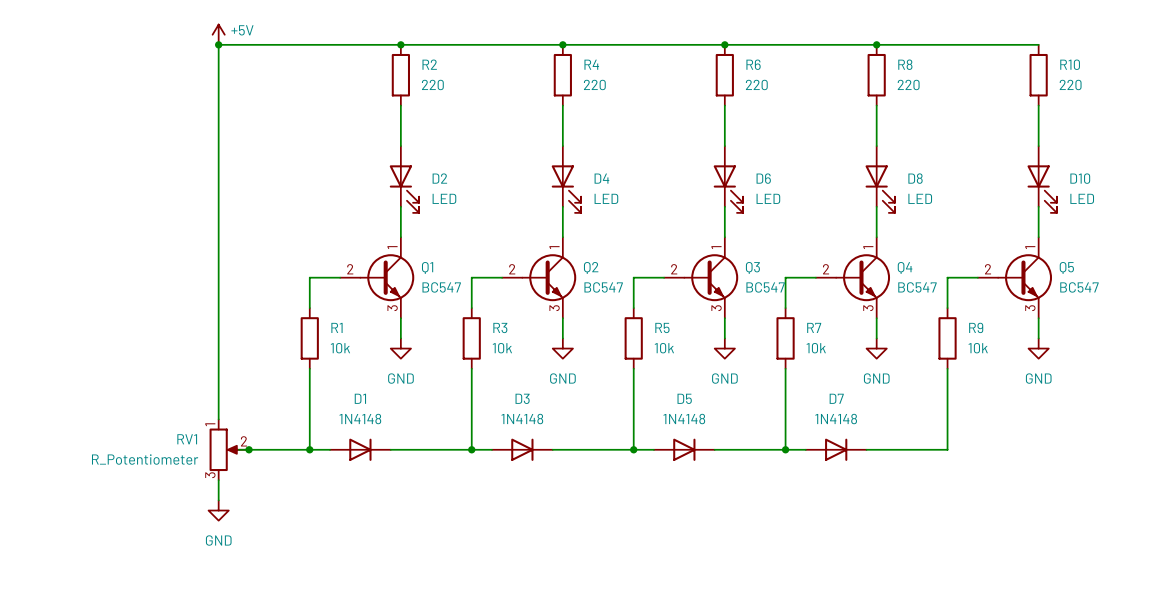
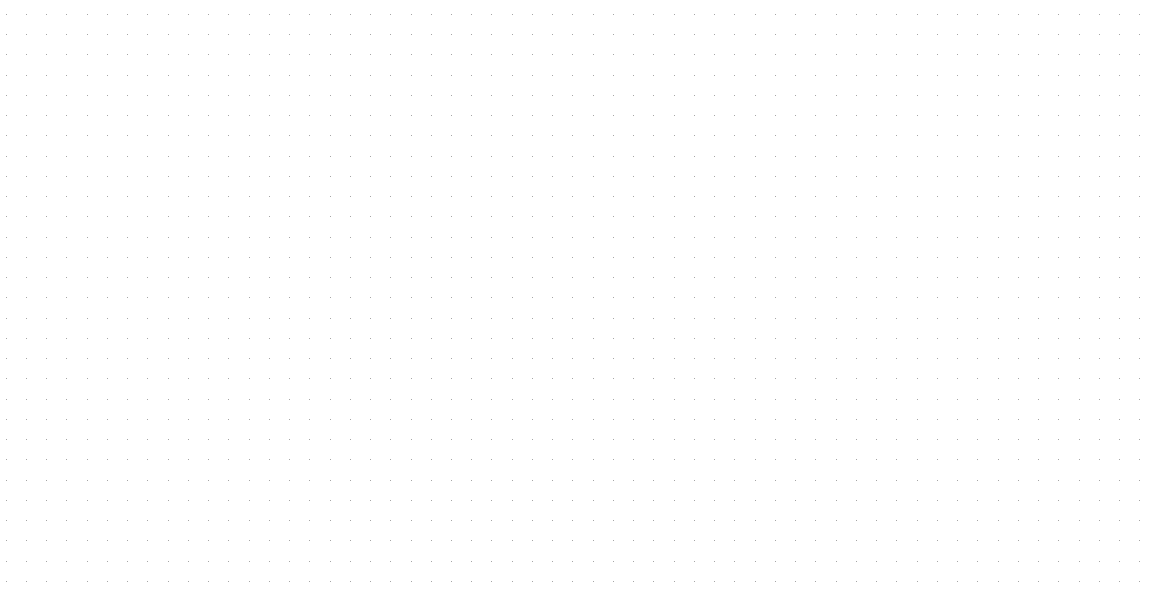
power symbol: +5V (218, 34) -> none
junction: (218, 44) -> none
junction: (400, 44) -> none
junction: (562, 44) -> none
junction: (724, 44) -> none
junction: (876, 44) -> none
wire: (1038, 44) (218, 44) (218, 419) -> none
R2: 220 (400, 75) -> none
R4: 220 (562, 75) -> none
R6: 220 (724, 75) -> none
R8: 220 (876, 75) -> none
R10: 220 (1038, 75) -> none
wire: (400, 105) (400, 146) -> none
wire: (562, 105) (562, 146) -> none
wire: (724, 105) (724, 146) -> none
wire: (876, 105) (876, 146) -> none
wire: (1038, 105) (1038, 146) -> none
D2: LED (404, 179) -> none
D4: LED (566, 179) -> none
D6: LED (728, 179) -> none
D8: LED (880, 179) -> none
D10: LED (1042, 179) -> none
wire: (400, 206) (400, 237) -> none
wire: (562, 206) (562, 237) -> none
wire: (724, 206) (724, 237) -> none
wire: (876, 206) (876, 237) -> none
wire: (1038, 206) (1038, 237) -> none
wire: (340, 277) (309, 277) (309, 308) -> none
Q1: BC547 (377, 277) -> none
wire: (502, 277) (471, 277) (471, 308) -> none
Q2: BC547 (539, 277) -> none
wire: (664, 277) (633, 277) (633, 308) -> none
Q3: BC547 (701, 277) -> none
wire: (815, 277) (785, 277) (785, 308) -> none
Q4: BC547 (852, 277) -> none
wire: (977, 277) (947, 277) (947, 308) -> none
Q5: BC547 (1014, 277) -> none
wire: (400, 318) (400, 338) -> none
wire: (562, 318) (562, 338) -> none
wire: (724, 318) (724, 338) -> none
wire: (876, 318) (876, 338) -> none
wire: (1038, 318) (1038, 338) -> none
R1: 10k (309, 338) -> none
R3: 10k (471, 338) -> none
R5: 10k (633, 338) -> none
R7: 10k (785, 338) -> none
R9: 10k (947, 338) -> none
power symbol: GND (400, 348) -> none
power symbol: GND (562, 348) -> none
power symbol: GND (724, 348) -> none
power symbol: GND (876, 348) -> none
power symbol: GND (1038, 348) -> none
wire: (309, 368) (309, 449) -> none
wire: (471, 368) (471, 449) -> none
wire: (633, 368) (633, 449) -> none
wire: (785, 368) (785, 449) -> none
wire: (947, 368) (947, 449) (866, 449) -> none
RV1: R_Potentiometer (229, 449) -> none
wire: (238, 449) (330, 449) -> none
junction: (249, 449) -> none
junction: (309, 449) -> none
D1: 1N4148 (360, 449) -> none
wire: (390, 449) (491, 449) -> none
junction: (471, 449) -> none
D3: 1N4148 (522, 449) -> none
wire: (552, 449) (653, 449) -> none
junction: (633, 449) -> none
D5: 1N4148 (684, 449) -> none
wire: (714, 449) (805, 449) -> none
junction: (785, 449) -> none
D7: 1N4148 (836, 449) -> none
wire: (218, 480) (218, 500) -> none
power symbol: GND (218, 510) -> none

